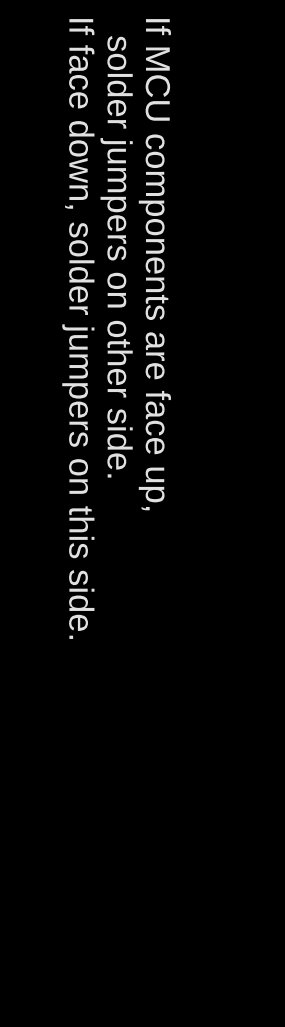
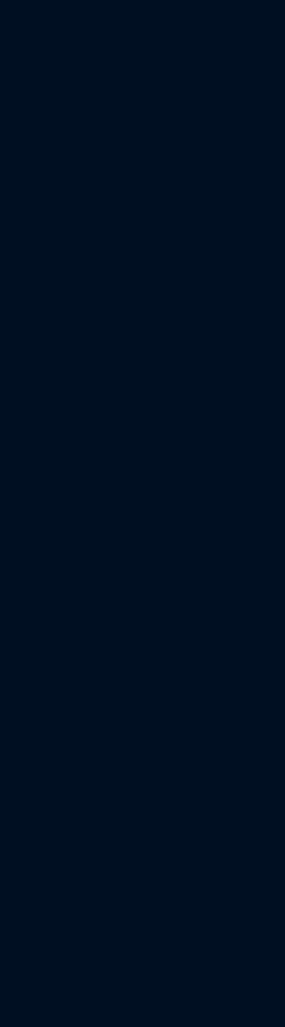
text: solder jumpers on other side. (116, 256) -> none
text: If MCU components are face up, (154, 264) -> none
text: If face down, solder jumpers on this side. (78, 329) -> none

